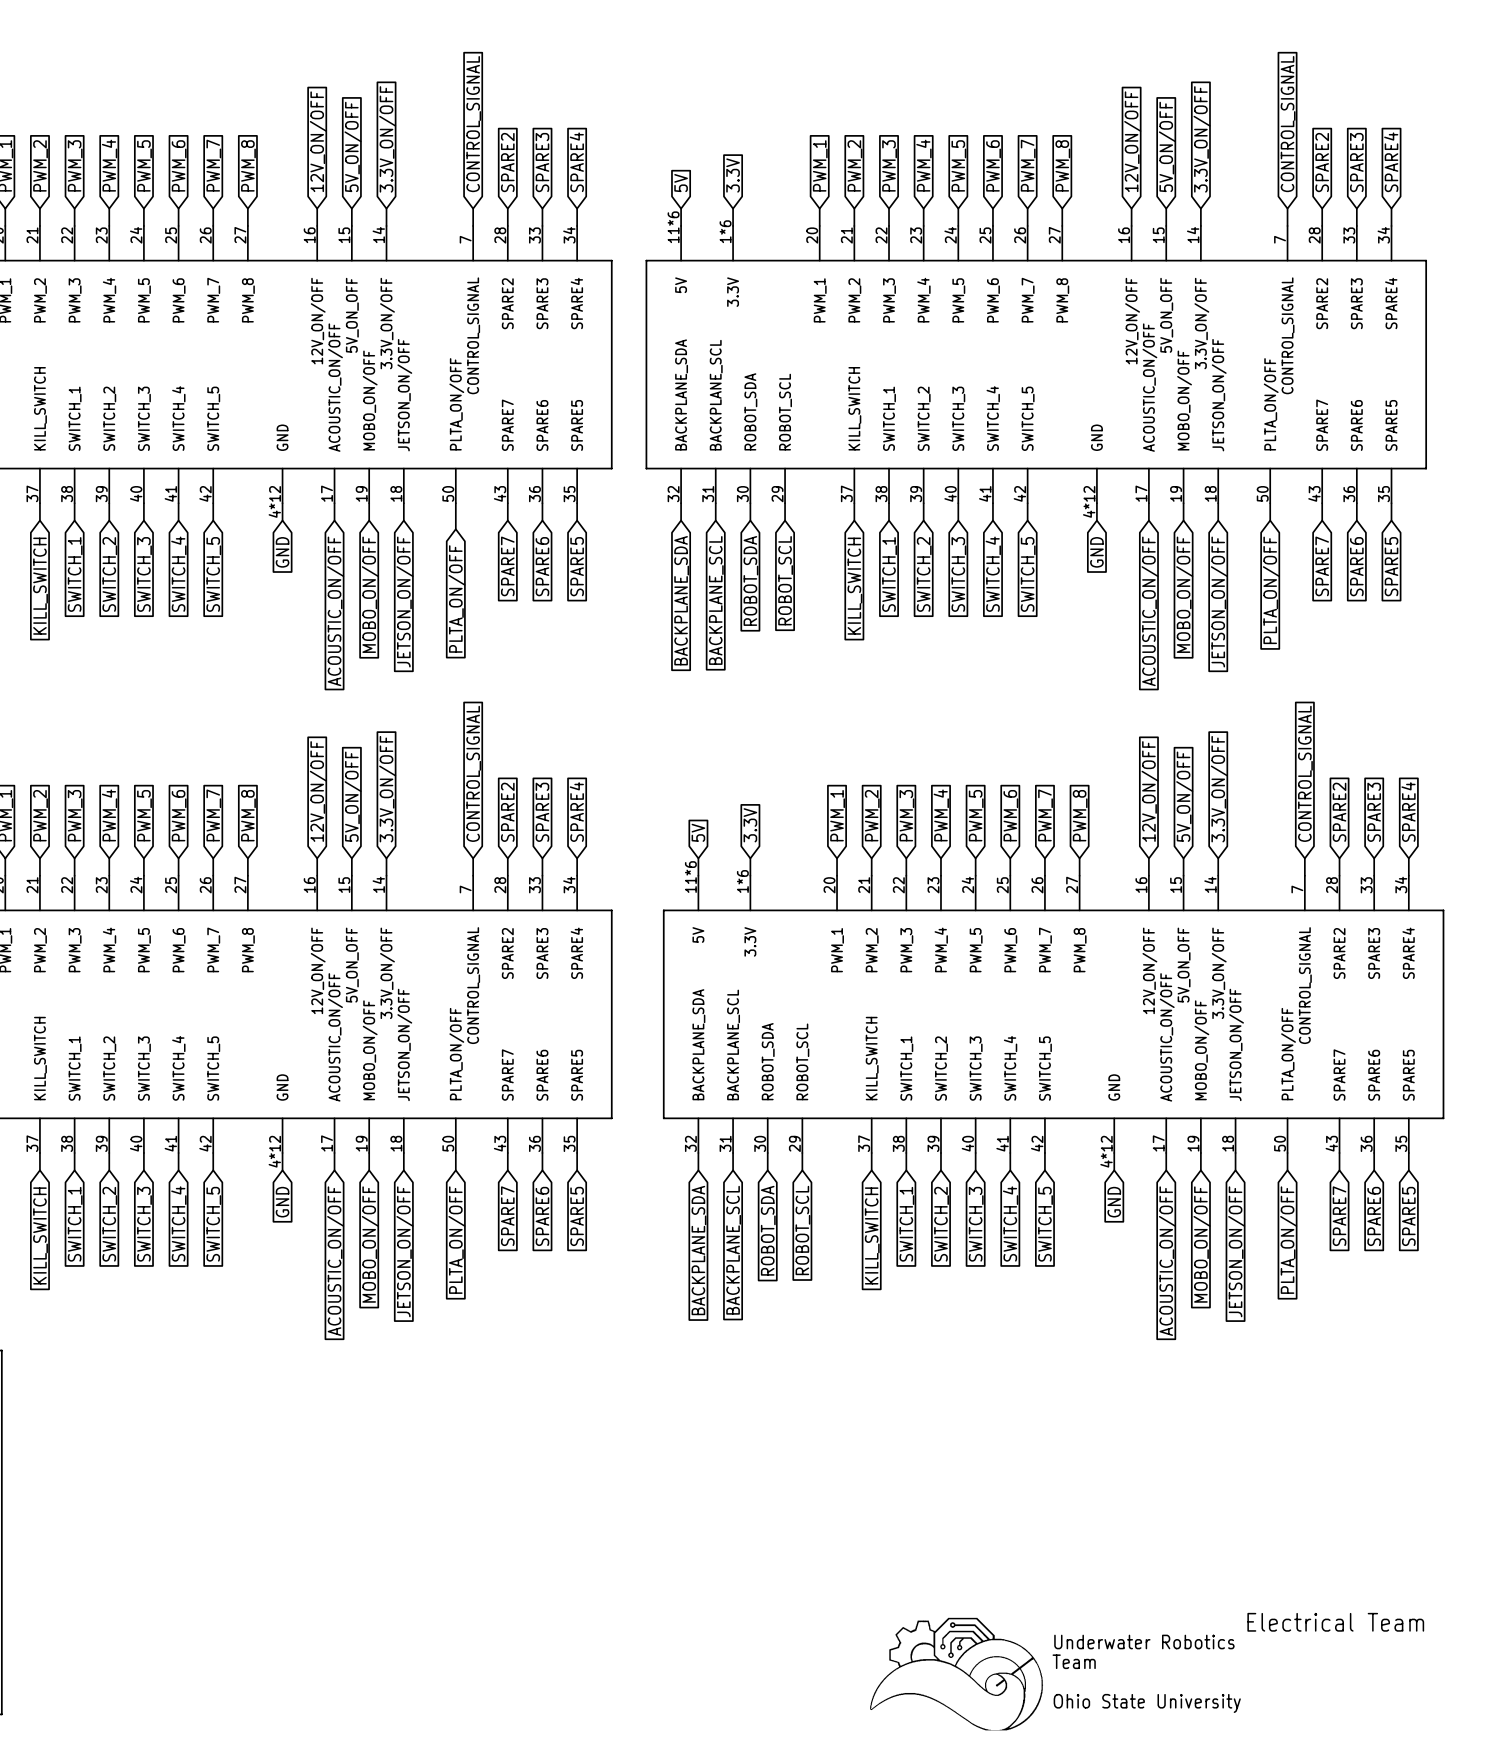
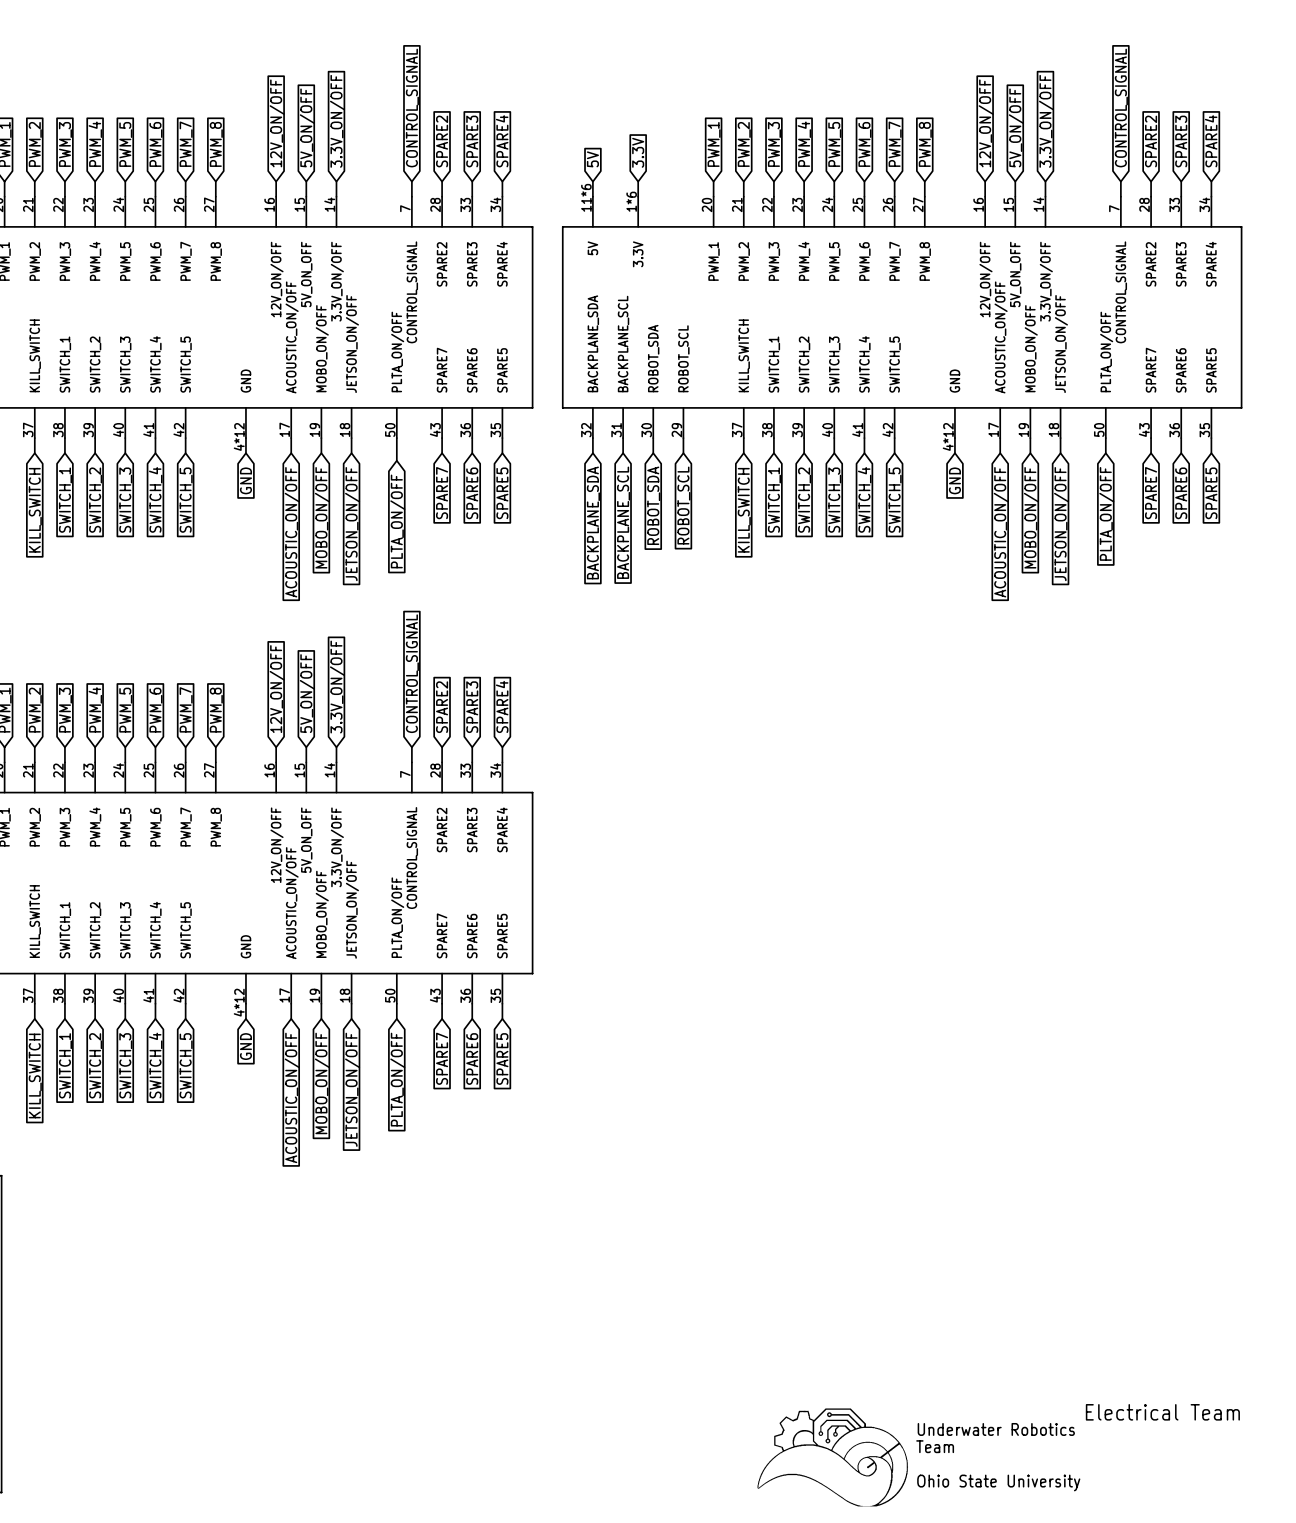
global label: CONTROL_SIGNAL (1305, 773) -> none
global label: 3.3V_ON/OFF (1219, 789) -> none
global label: 12V_ON/OFF (1150, 791) -> none
global label: 5V_ON/OFF (1184, 796) -> none
global label: SPARE2 (1339, 812) -> none
global label: SPARE3 (1374, 812) -> none
global label: SPARE4 (1408, 812) -> none
global label: PWM_1 (837, 815) -> none
global label: PWM_2 (872, 815) -> none
global label: PWM_3 (906, 815) -> none
global label: PWM_4 (941, 815) -> none
global label: PWM_5 (976, 815) -> none
global label: PWM_6 (1010, 815) -> none
global label: PWM_7 (1045, 815) -> none
global label: PWM_8 (1080, 815) -> none
global label: 3.3V (750, 825) -> none
global label: 5V (698, 832) -> none
wire: (698, 858) (698, 875) -> none
wire: (750, 858) (750, 875) -> none
wire: (837, 858) (837, 875) -> none
wire: (871, 858) (871, 875) -> none
wire: (906, 858) (906, 875) -> none
wire: (940, 858) (940, 875) -> none
wire: (975, 858) (975, 875) -> none
wire: (1010, 858) (1010, 875) -> none
wire: (1044, 858) (1044, 875) -> none
wire: (1079, 858) (1079, 875) -> none
wire: (1148, 858) (1148, 875) -> none
wire: (1183, 858) (1183, 875) -> none
wire: (1218, 858) (1218, 875) -> none
wire: (1304, 858) (1304, 875) -> none
wire: (1339, 858) (1339, 875) -> none
wire: (1374, 858) (1374, 875) -> none
wire: (1408, 858) (1408, 875) -> none
part: (1053, 1014) -> none
wire: (698, 1152) (698, 1170) -> none
wire: (733, 1152) (733, 1170) -> none
wire: (767, 1152) (767, 1170) -> none
wire: (802, 1152) (802, 1170) -> none
wire: (871, 1152) (871, 1170) -> none
wire: (906, 1152) (906, 1170) -> none
wire: (940, 1152) (940, 1170) -> none
wire: (975, 1152) (975, 1170) -> none
wire: (1010, 1152) (1010, 1170) -> none
wire: (1044, 1152) (1044, 1170) -> none
wire: (1114, 1152) (1114, 1170) -> none
wire: (1166, 1152) (1166, 1170) -> none
wire: (1200, 1152) (1200, 1170) -> none
wire: (1235, 1152) (1235, 1170) -> none
wire: (1287, 1152) (1287, 1170) -> none
wire: (1339, 1152) (1339, 1170) -> none
wire: (1374, 1152) (1374, 1170) -> none
wire: (1408, 1152) (1408, 1170) -> none
global label: GND (1114, 1202) -> none
global label: SPARE7 (1339, 1216) -> none
global label: SPARE6 (1374, 1216) -> none
global label: SPARE5 (1408, 1216) -> none
global label: SWITCH_4 (1010, 1223) -> none
global label: SWITCH_1 (906, 1224) -> none
global label: SWITCH_2 (941, 1224) -> none
global label: SWITCH_3 (976, 1224) -> none
global label: SWITCH_5 (1045, 1224) -> none
global label: ROBOT_SDA (768, 1230) -> none
global label: ROBOT_SCL (802, 1230) -> none
global label: KILL_SWITCH (872, 1235) -> none
global label: PLTA_ON/OFF (1288, 1240) -> none
global label: MOBO_ON/OFF (1202, 1244) -> none
global label: BACKPLANE_SDA (698, 1250) -> none
global label: BACKPLANE_SCL (733, 1250) -> none
global label: JETSON_ON/OFF (1236, 1251) -> none
global label: ACOUSTIC_ON/OFF (1167, 1261) -> none

